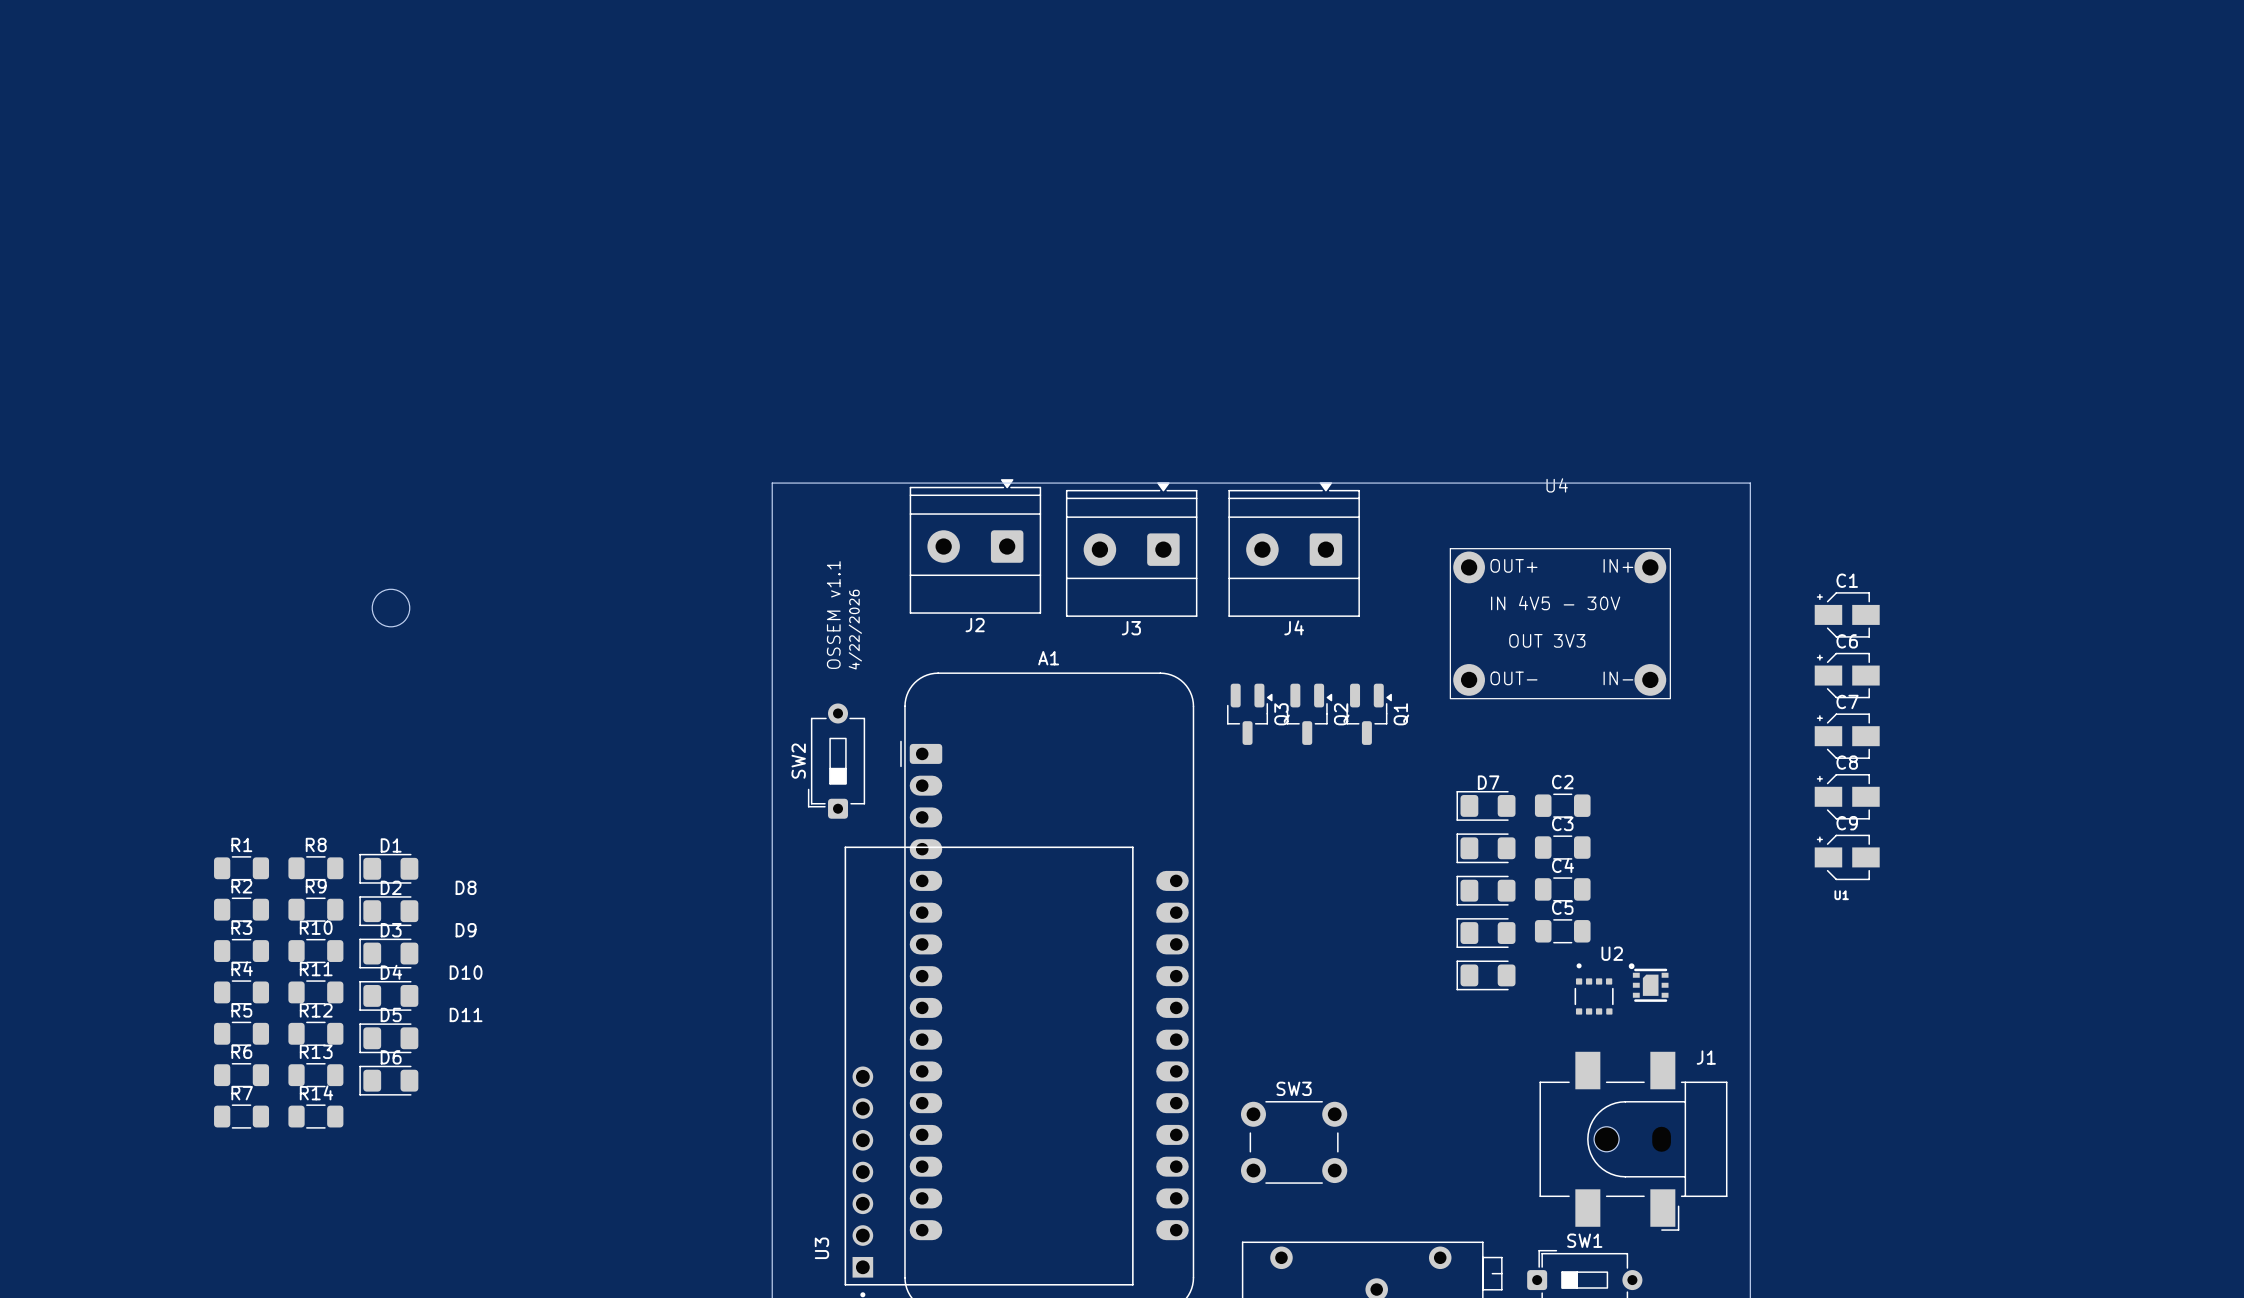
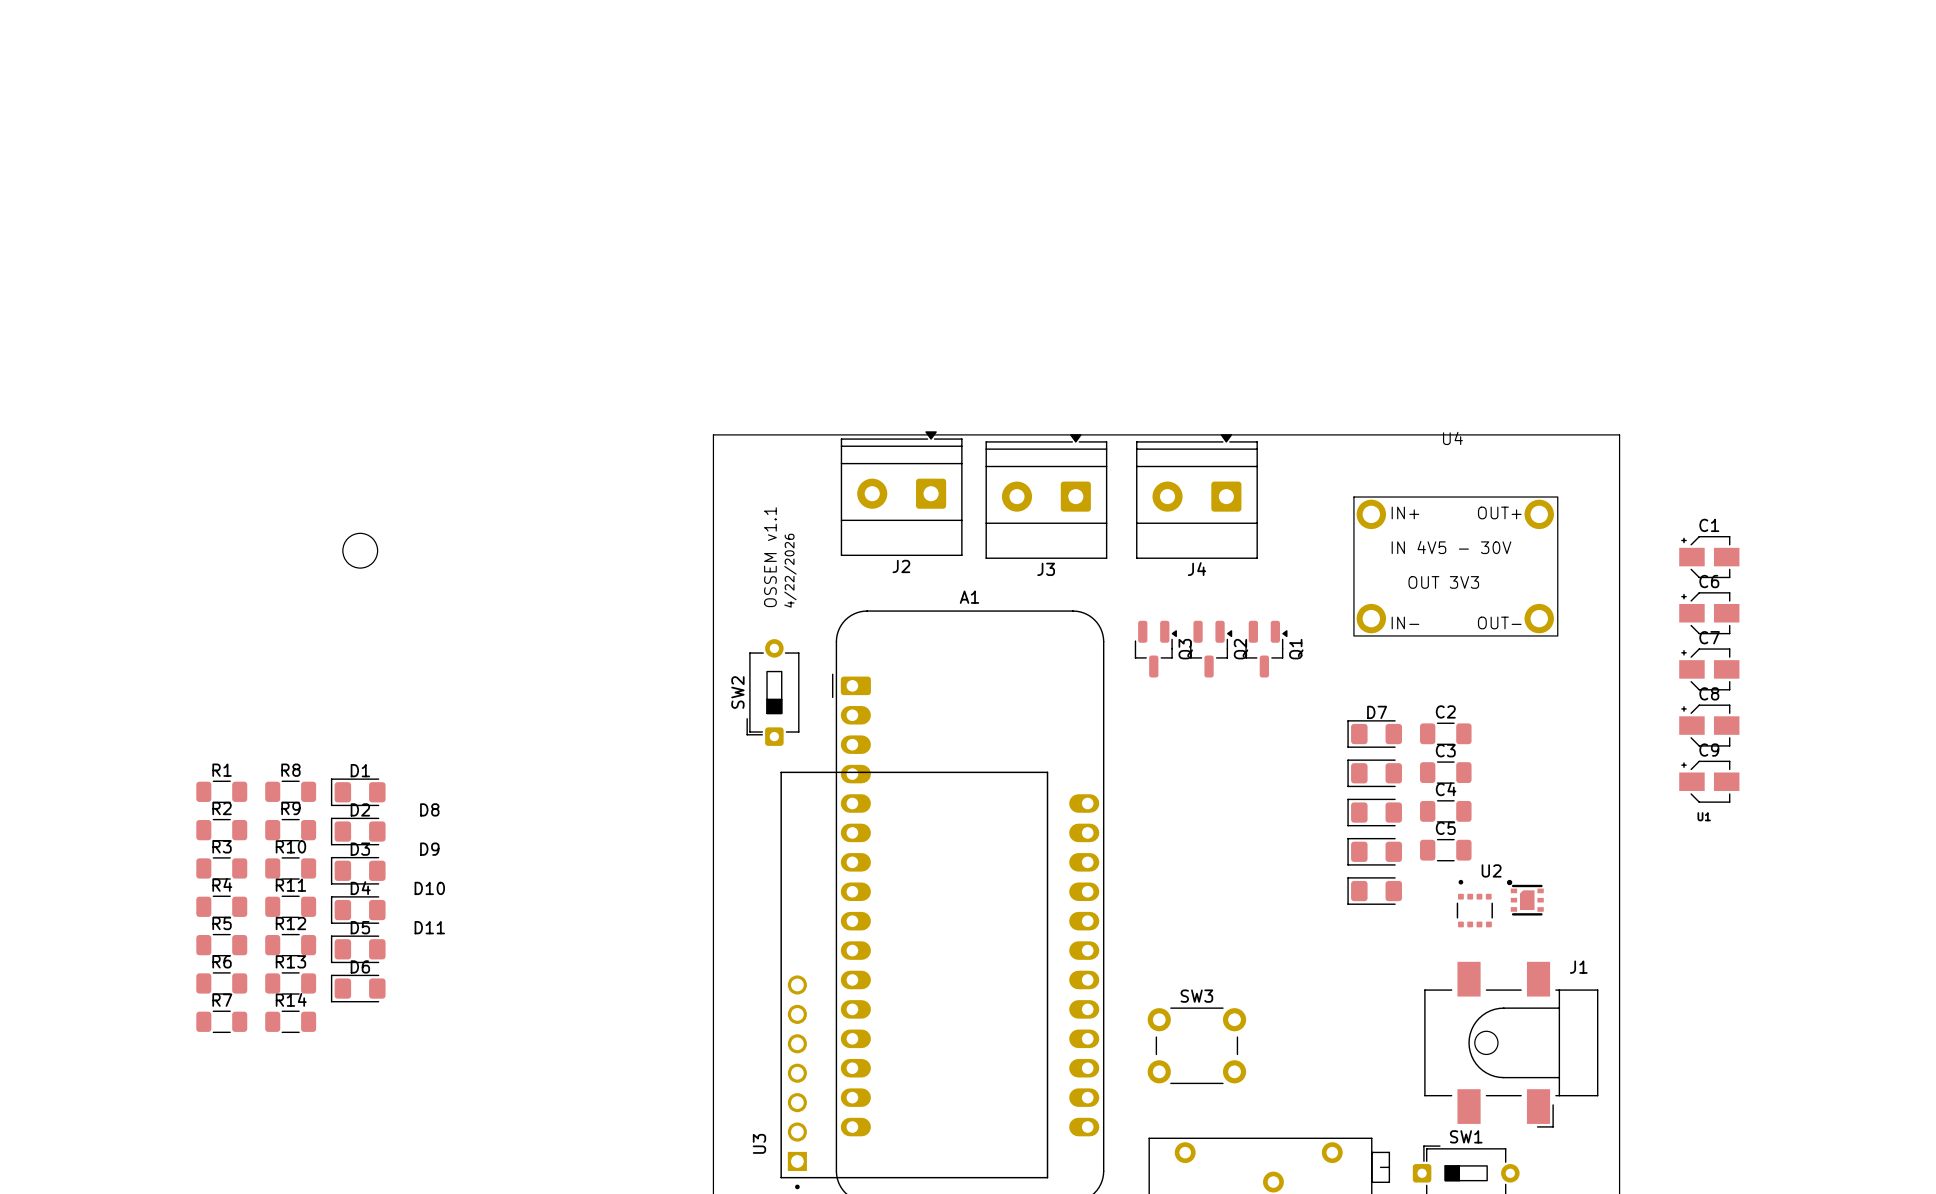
U4 footprint: [1450, 548, 1671, 699] -> [1353, 496, 1559, 637]

